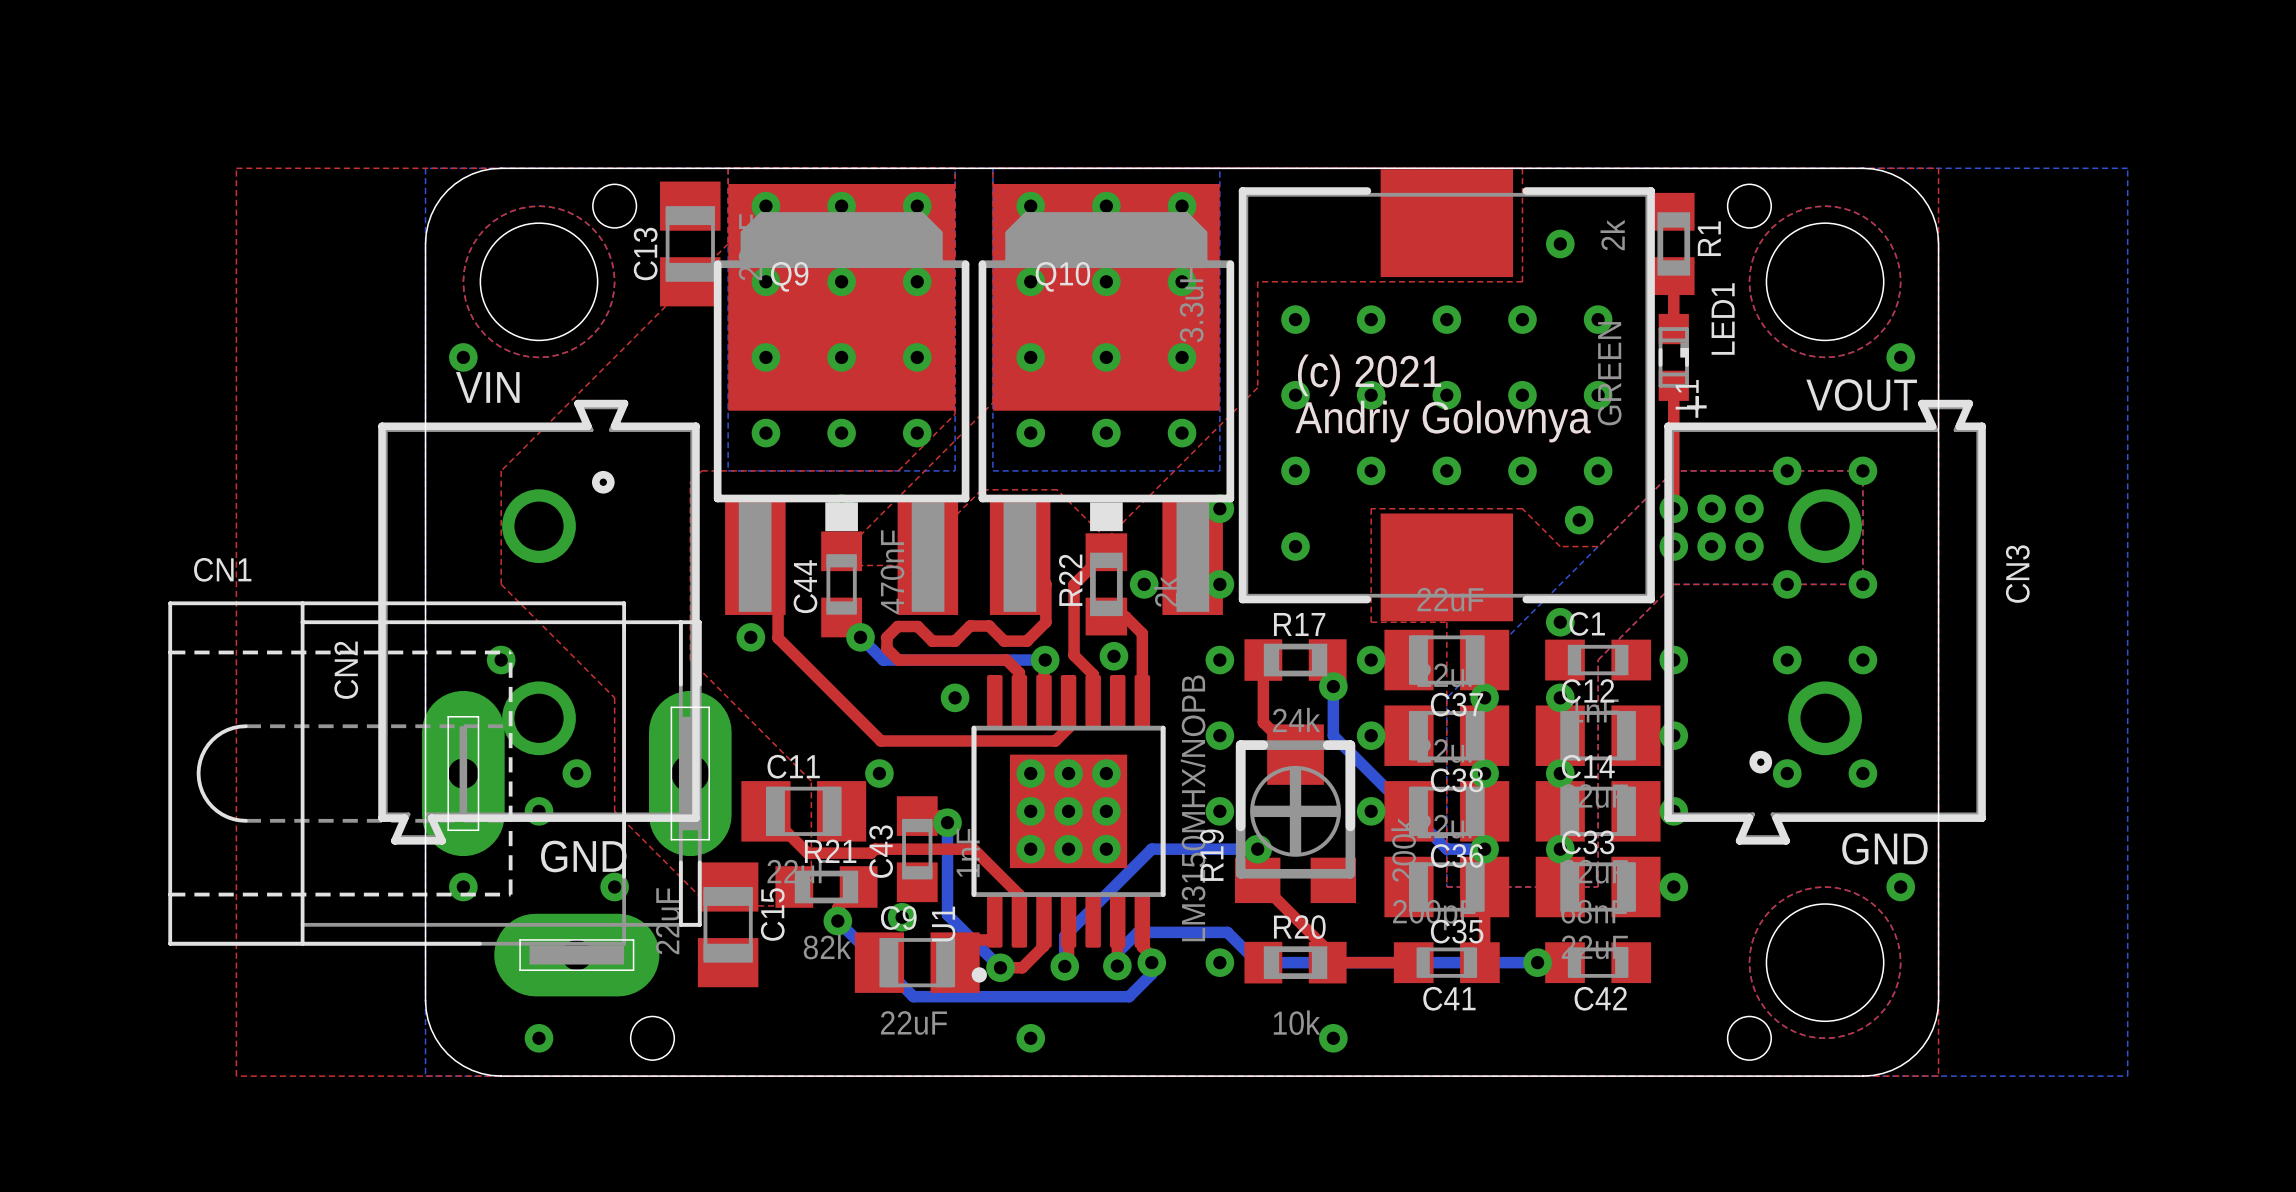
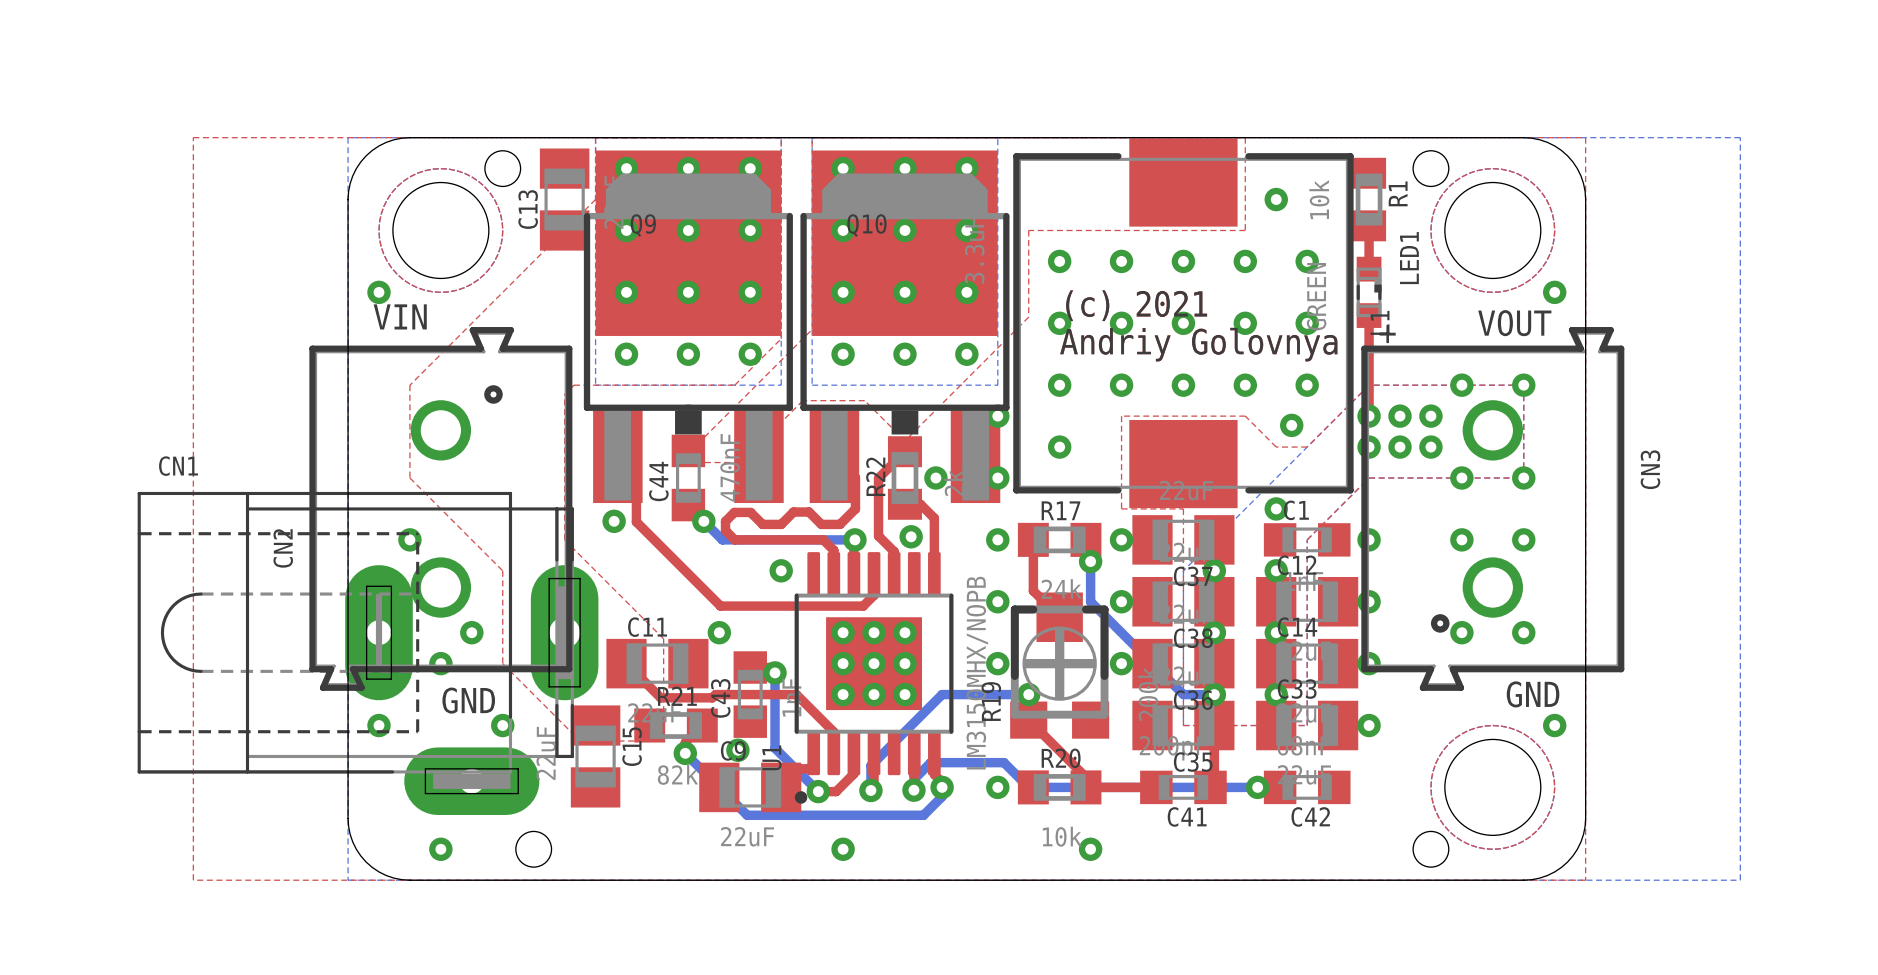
R1 value: 2k (1612, 235) -> 10k (1319, 199)

